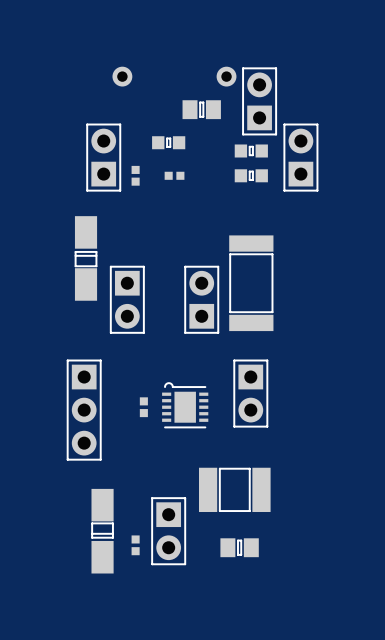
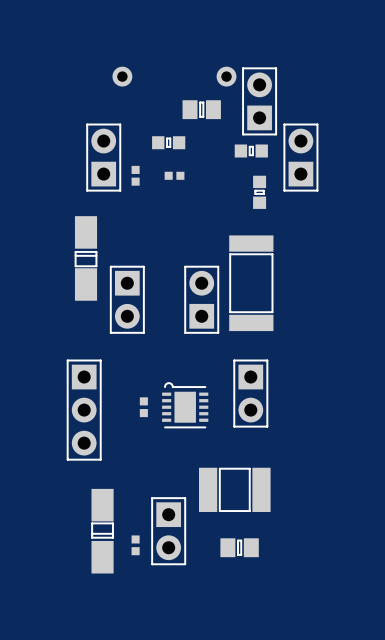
part rotation: 0° (251, 175) -> 90° clockwise (259, 192)

